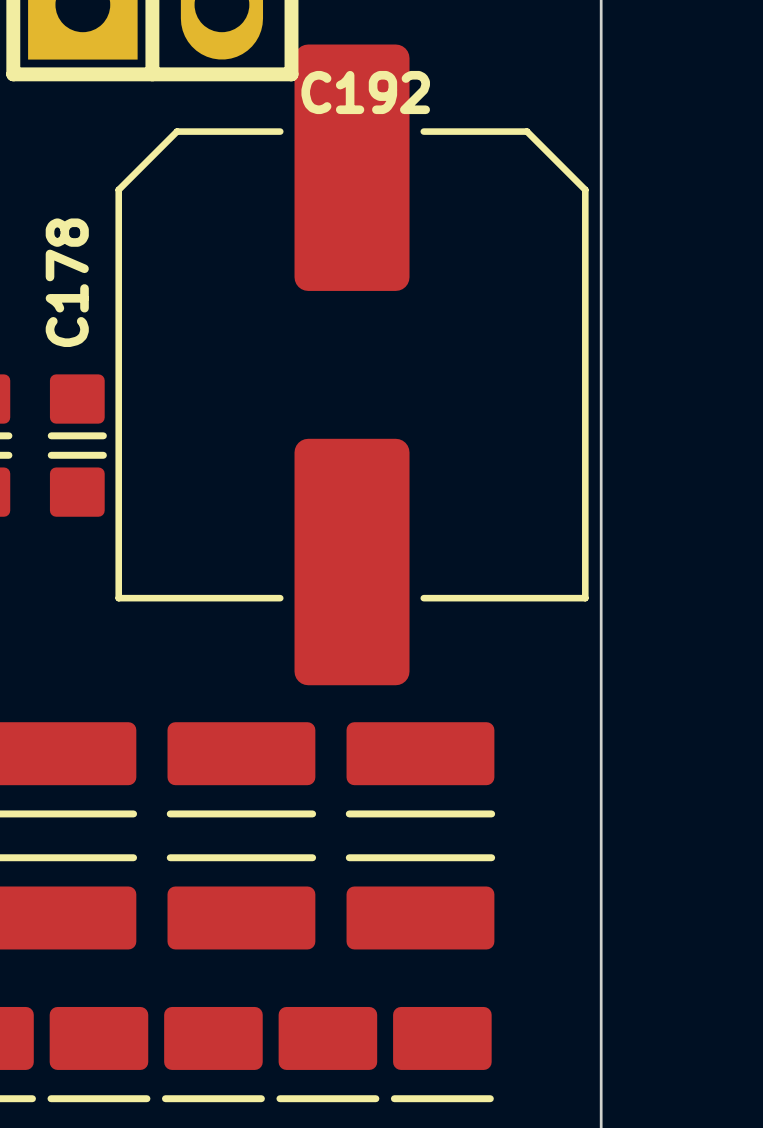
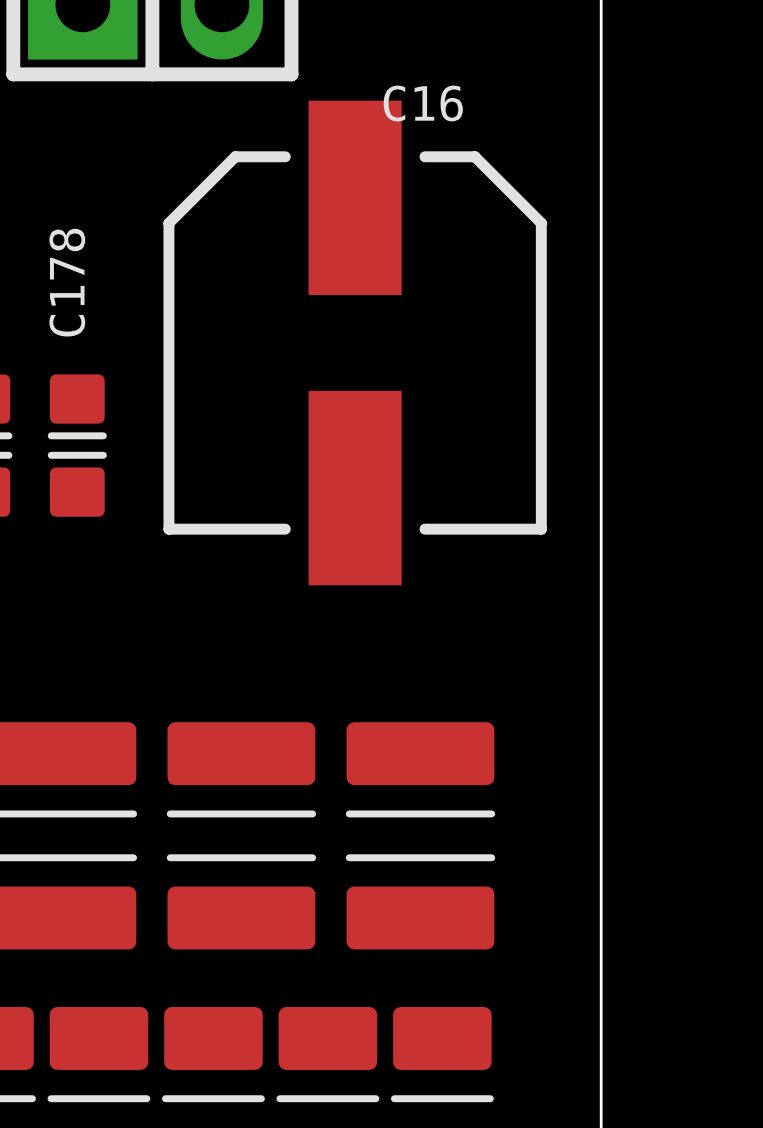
C16: none -> (355, 342)
C192: (352, 364) -> none

